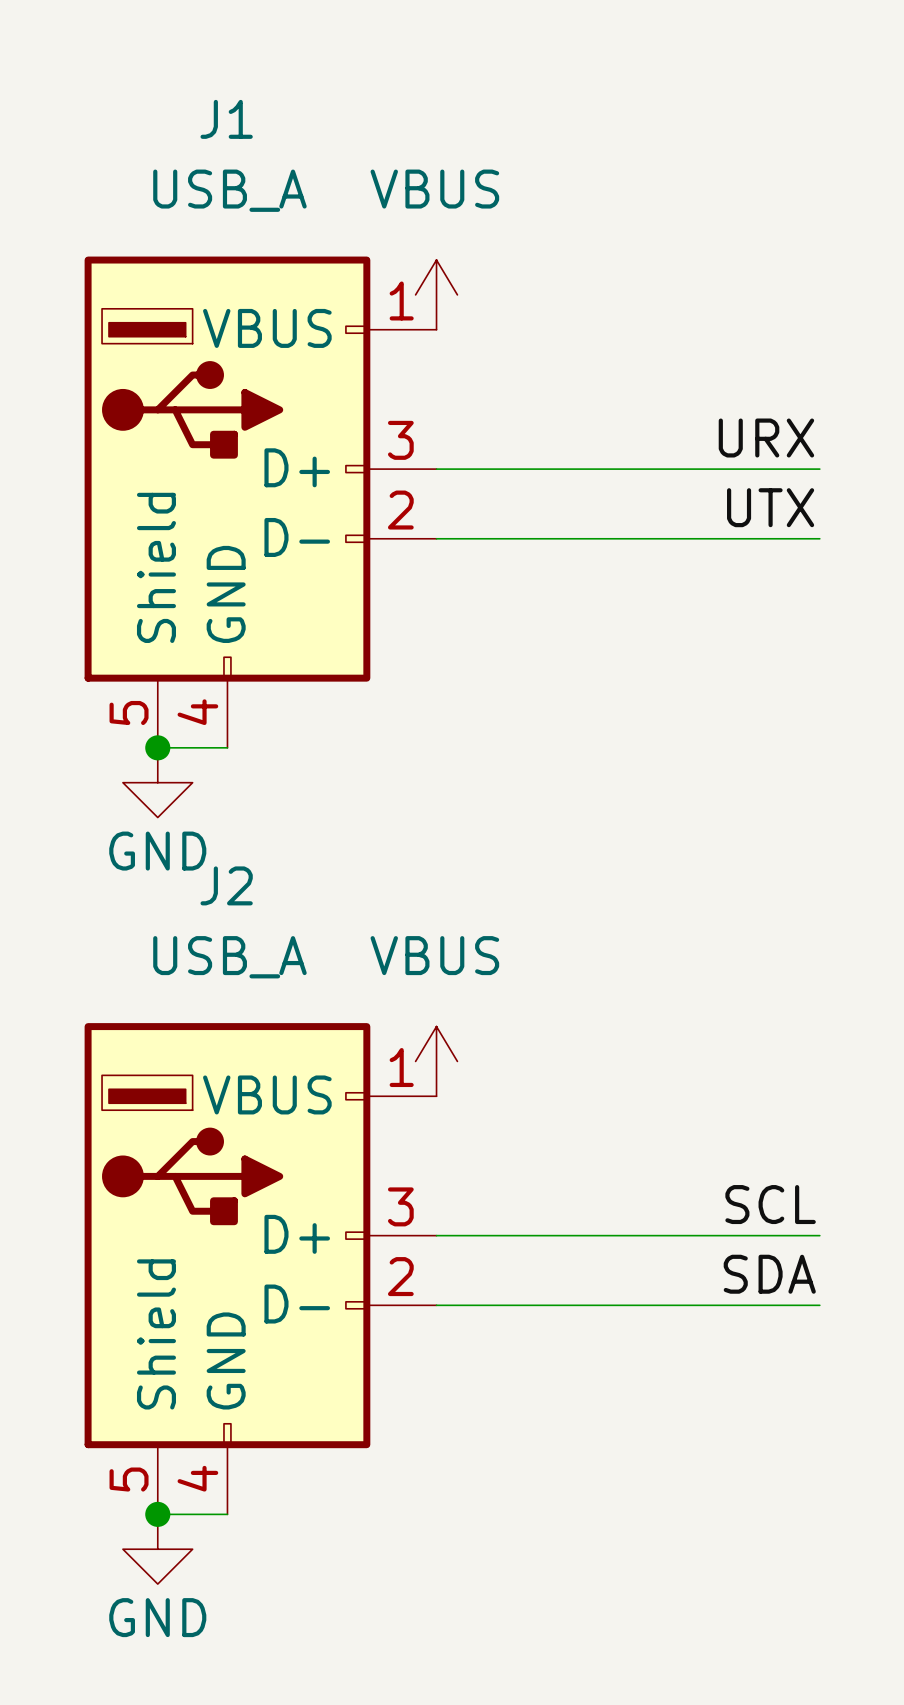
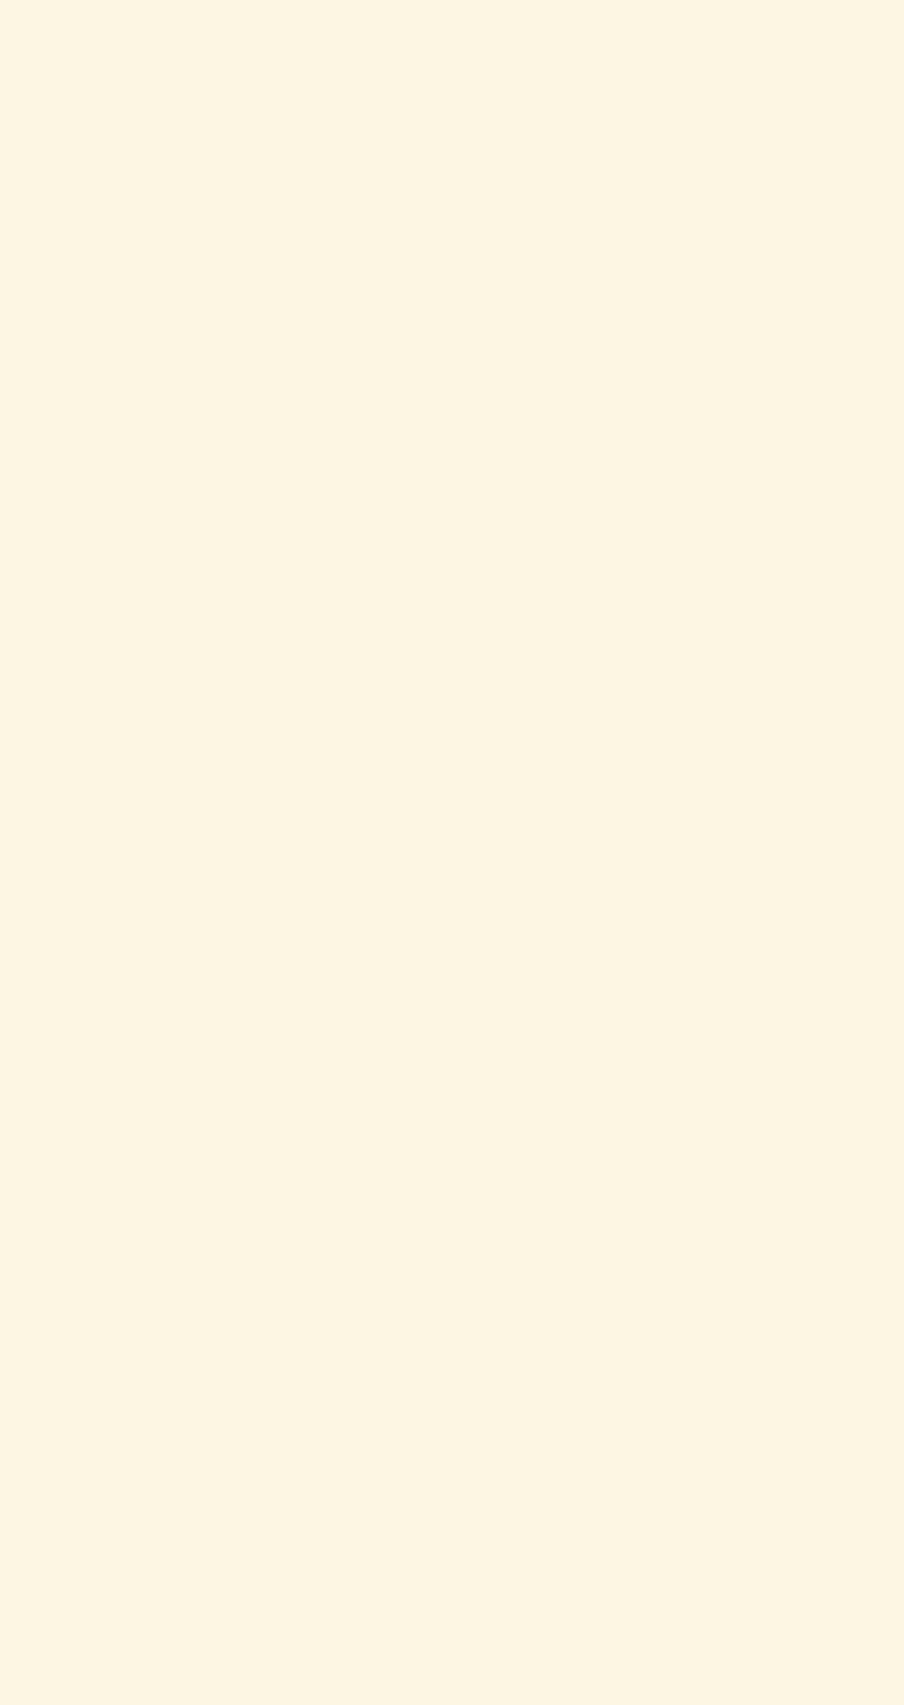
power symbol: VBUS (436, 294) -> none
label: URX (766, 438) -> none
wire: (436, 469) (819, 469) -> none
J1: USB_A (260, 502) -> none
label: UTX (770, 507) -> none
wire: (436, 538) (819, 538) -> none
wire: (157, 747) (227, 747) -> none
junction: (157, 747) -> none
power symbol: GND (157, 782) -> none
power symbol: VBUS (436, 1061) -> none
label: SCL (770, 1204) -> none
wire: (436, 1235) (819, 1235) -> none
J2: USB_A (260, 1268) -> none
label: SDA (769, 1274) -> none
wire: (436, 1305) (819, 1305) -> none
wire: (157, 1514) (227, 1514) -> none
junction: (157, 1514) -> none
power symbol: GND (157, 1549) -> none

